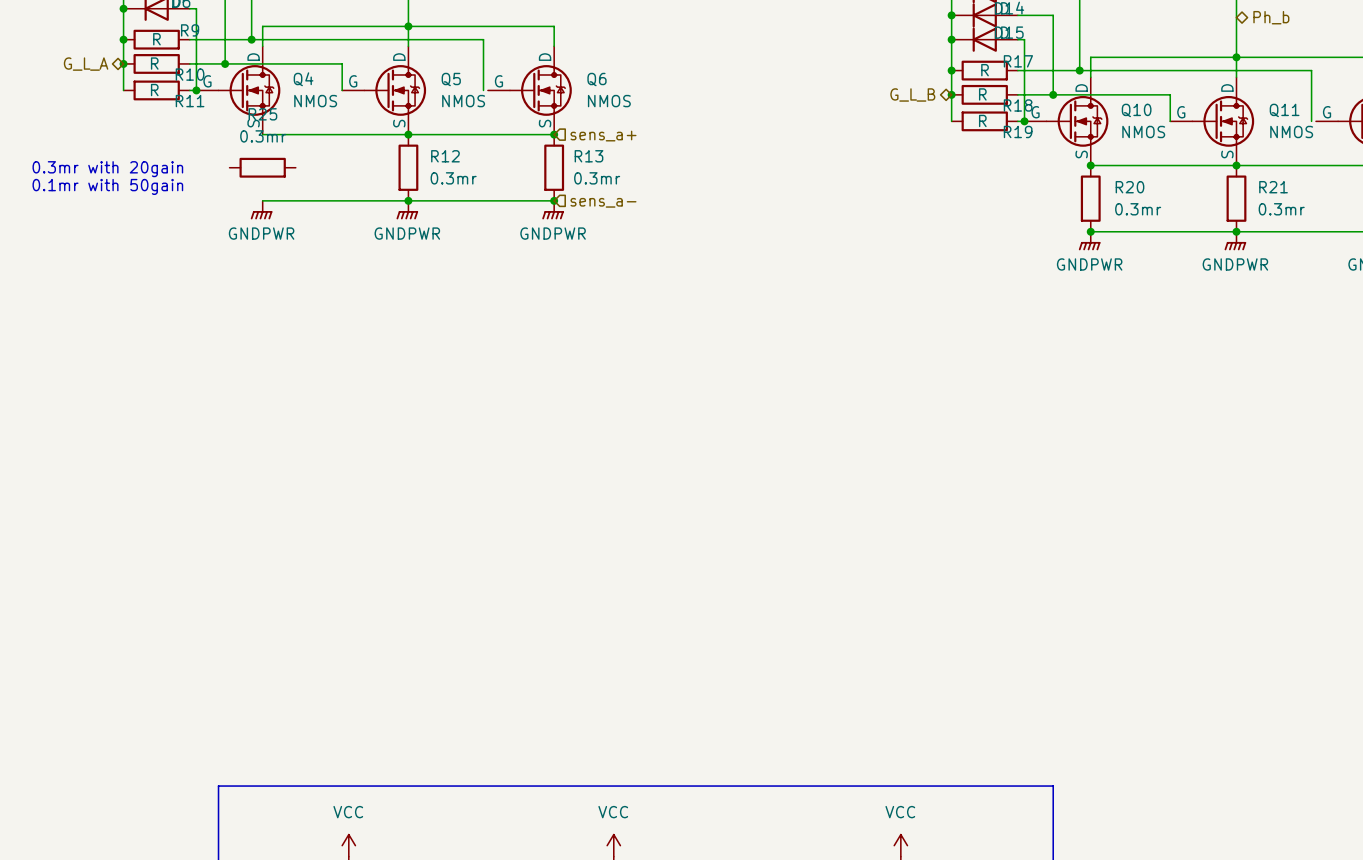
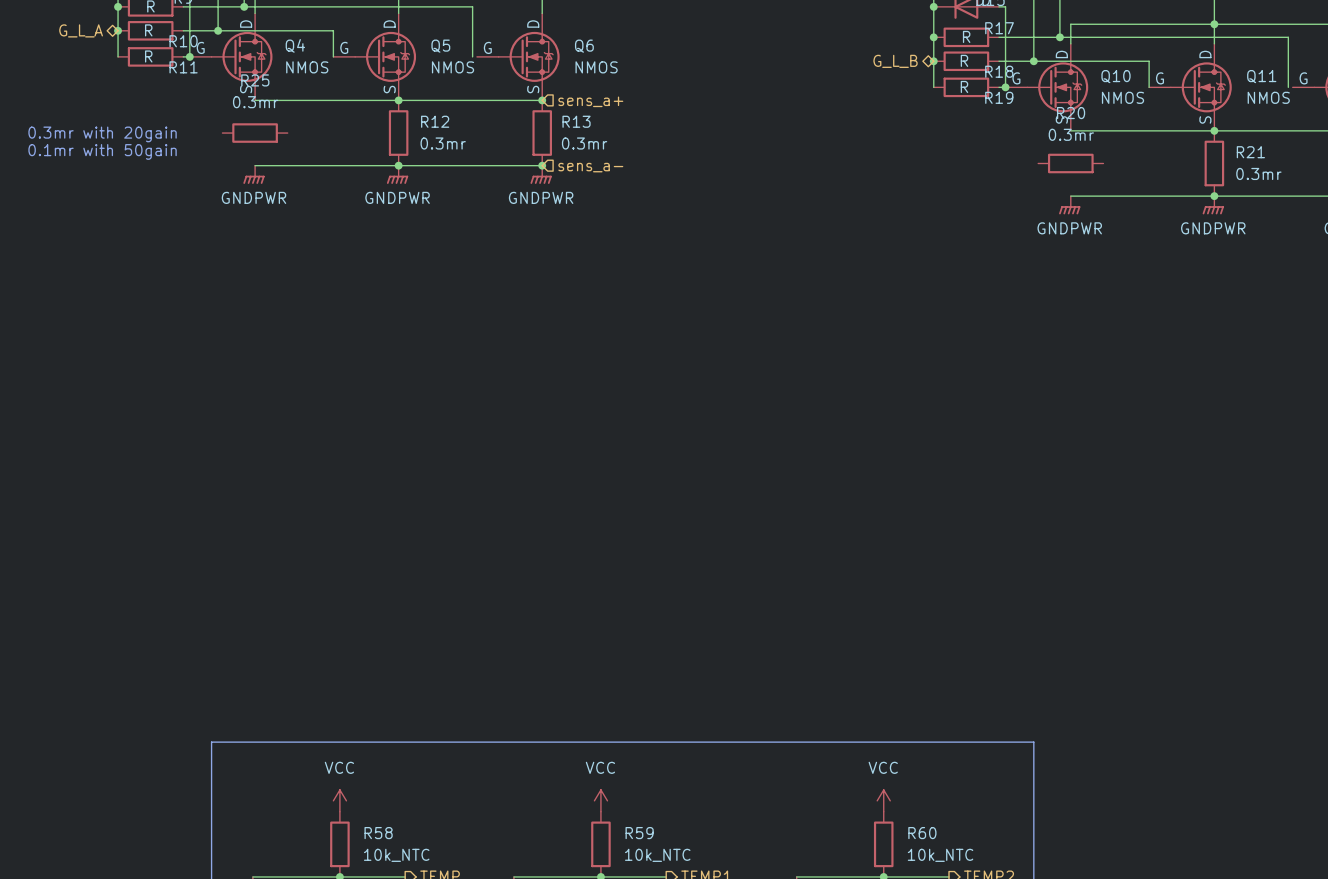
junction: (1090, 165) -> none
R20 name position: R20 (1130, 187) -> R20 (1071, 113)
R20 rotation: 0° (1090, 198) -> 90° clockwise (1070, 163)
R20 value position: 0.3mr (1138, 209) -> 0.3mr (1071, 134)
junction: (1090, 231) -> none

